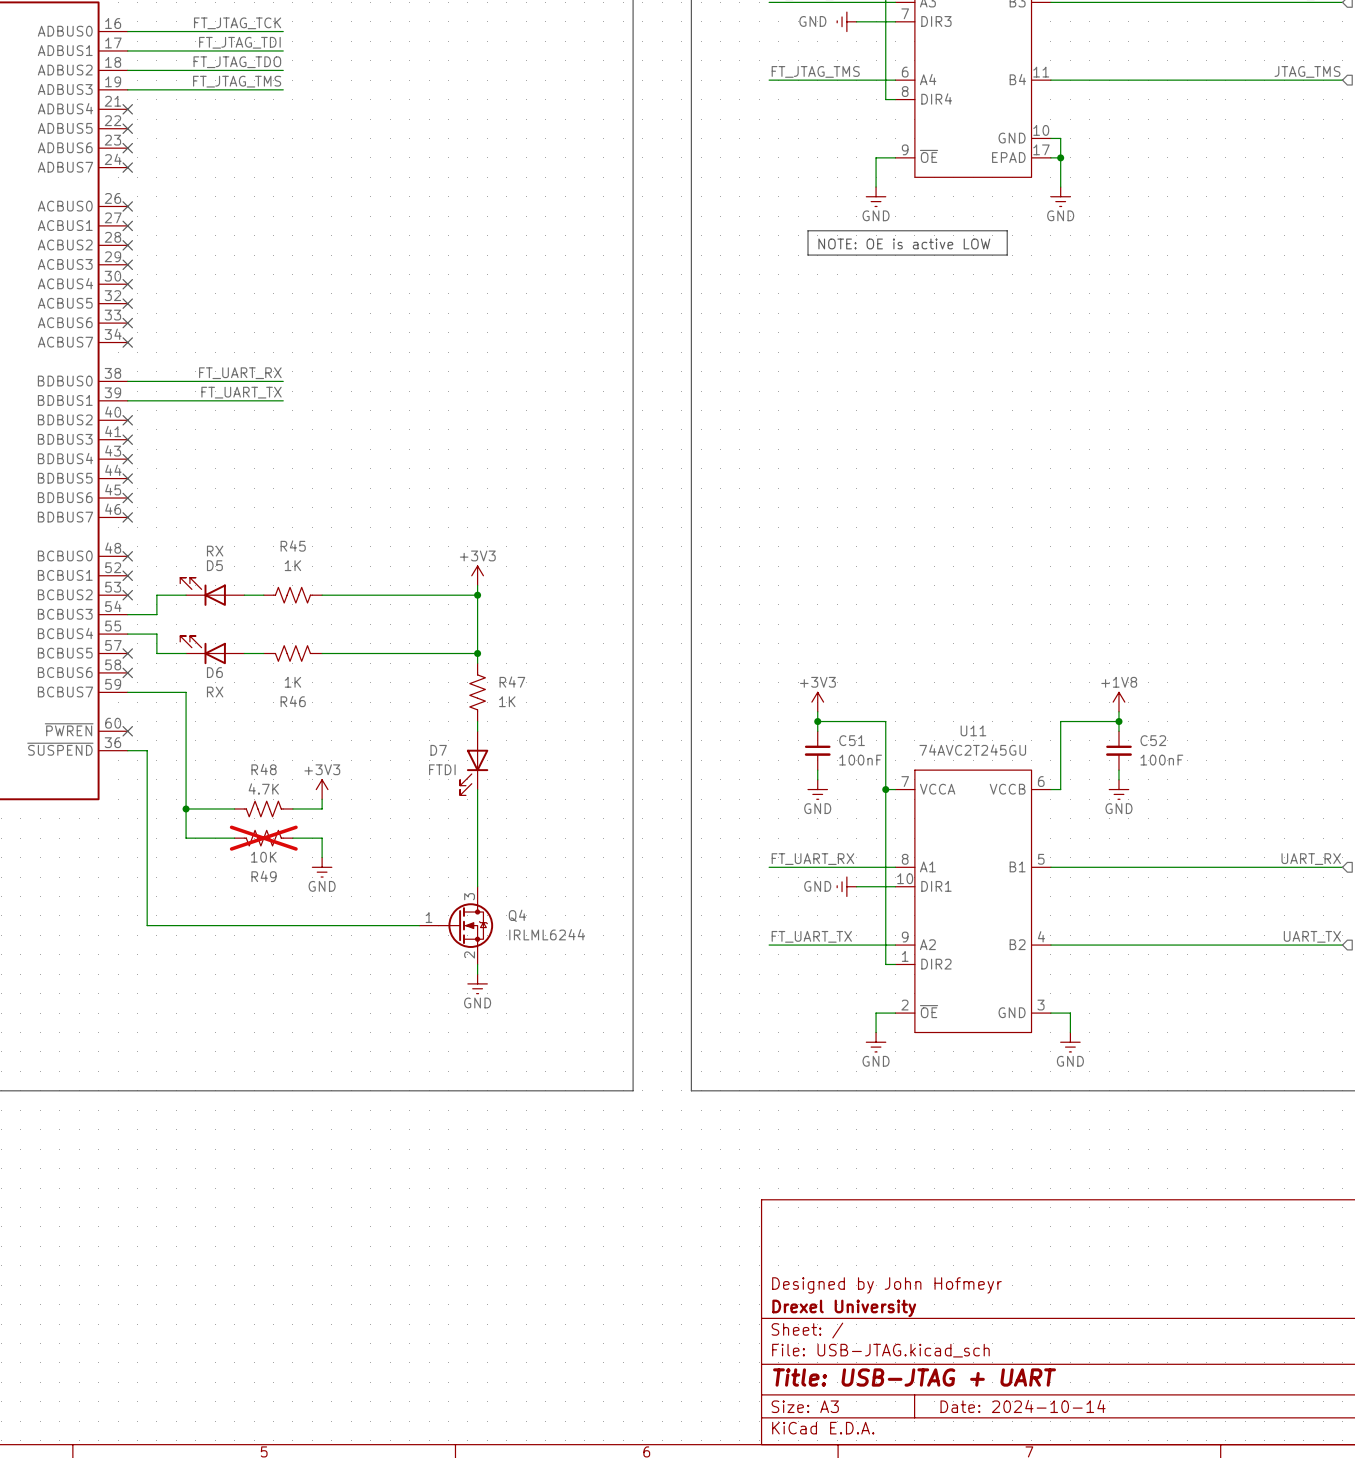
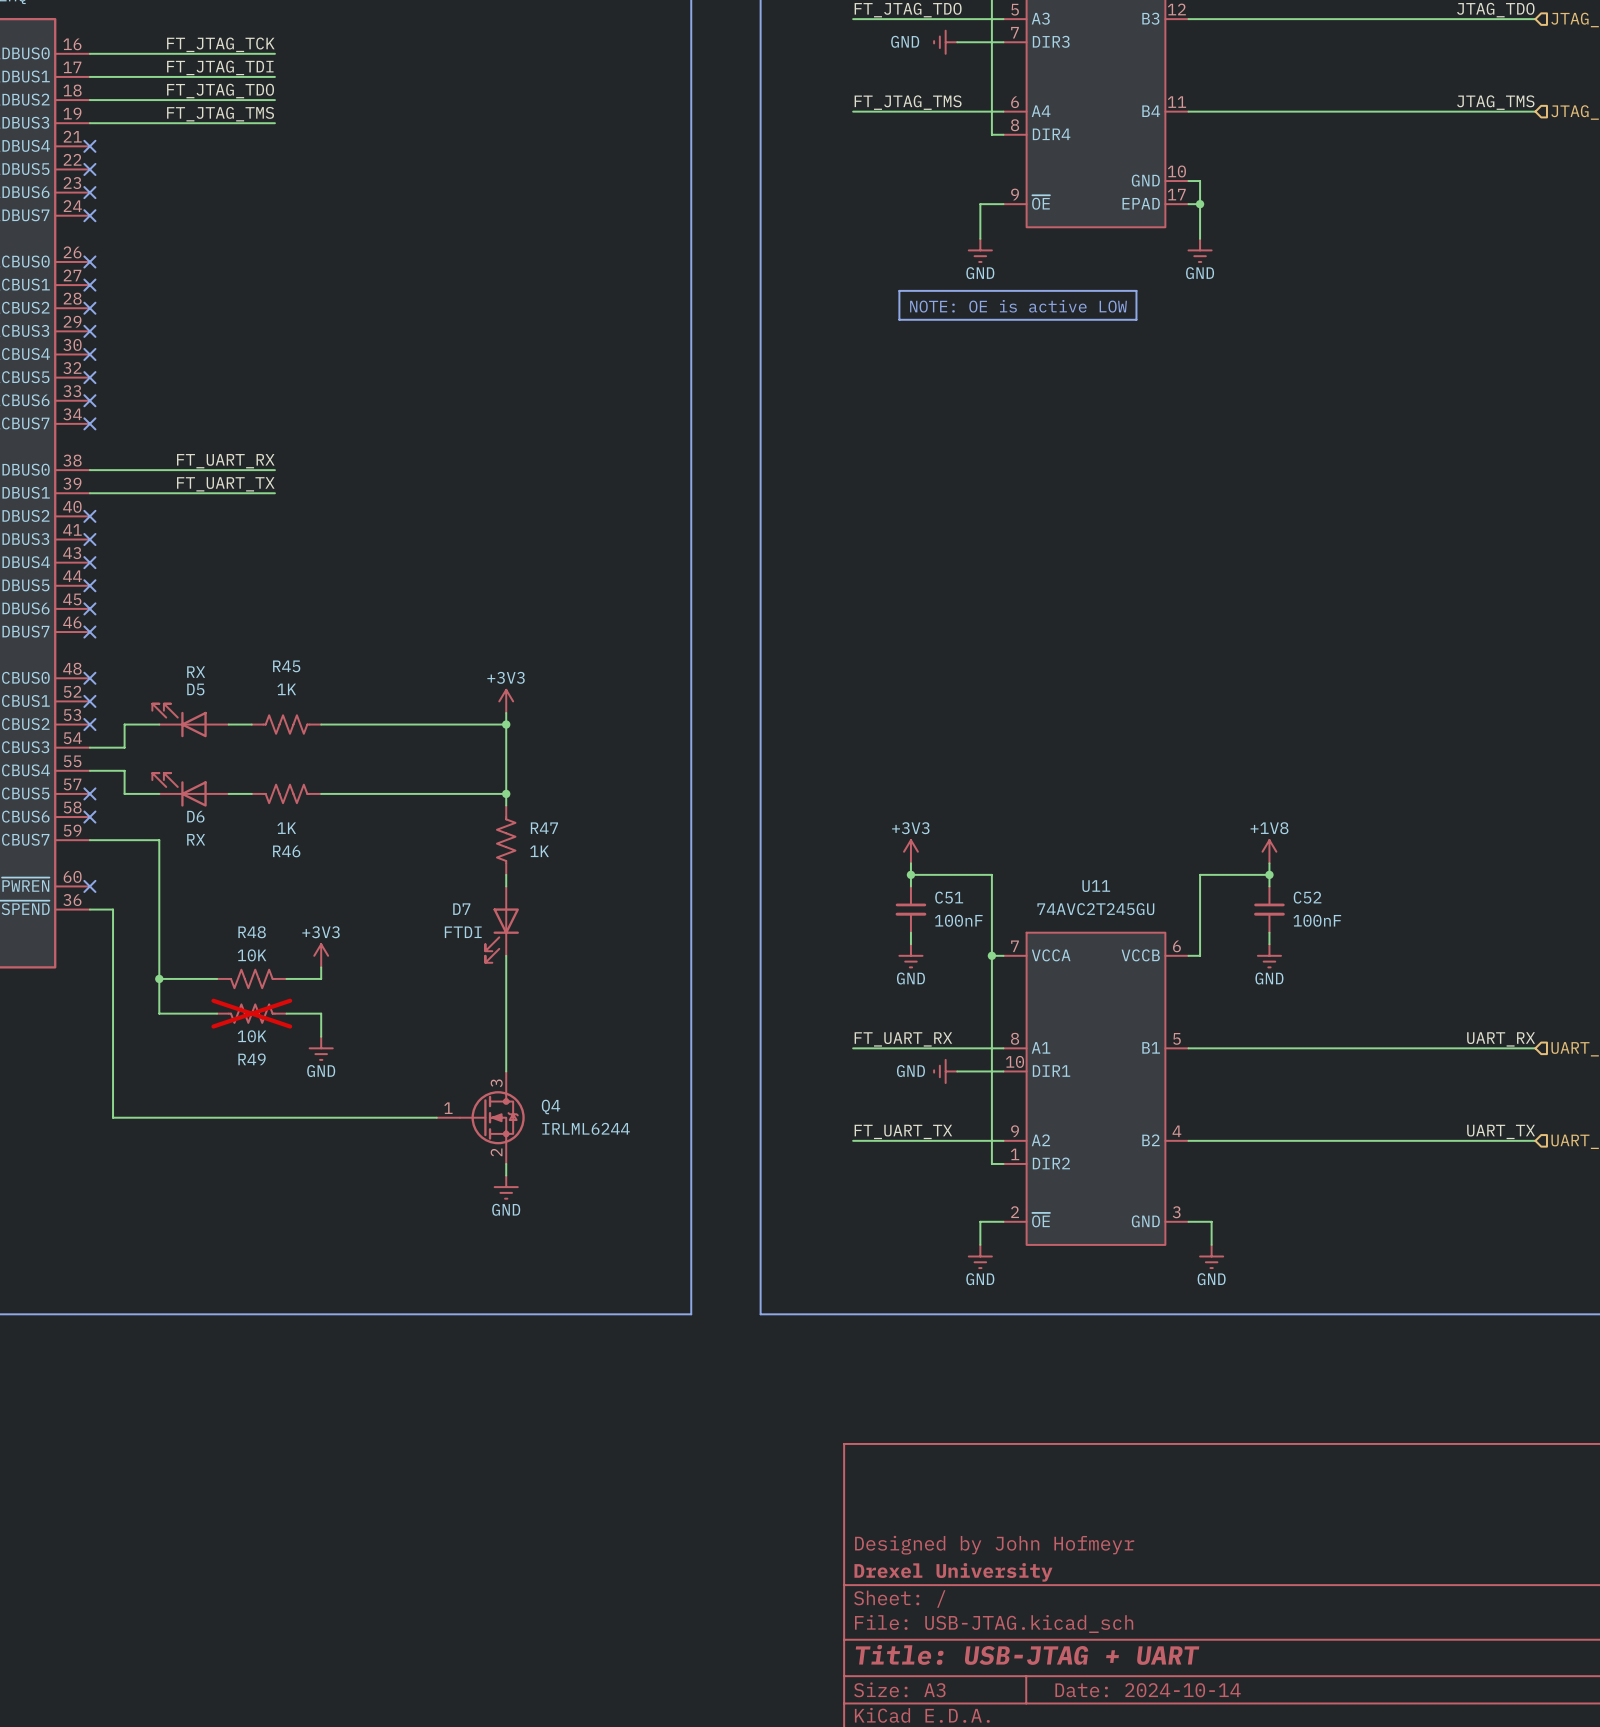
R48 value: 4.7K (263, 788) -> 10K (252, 955)

